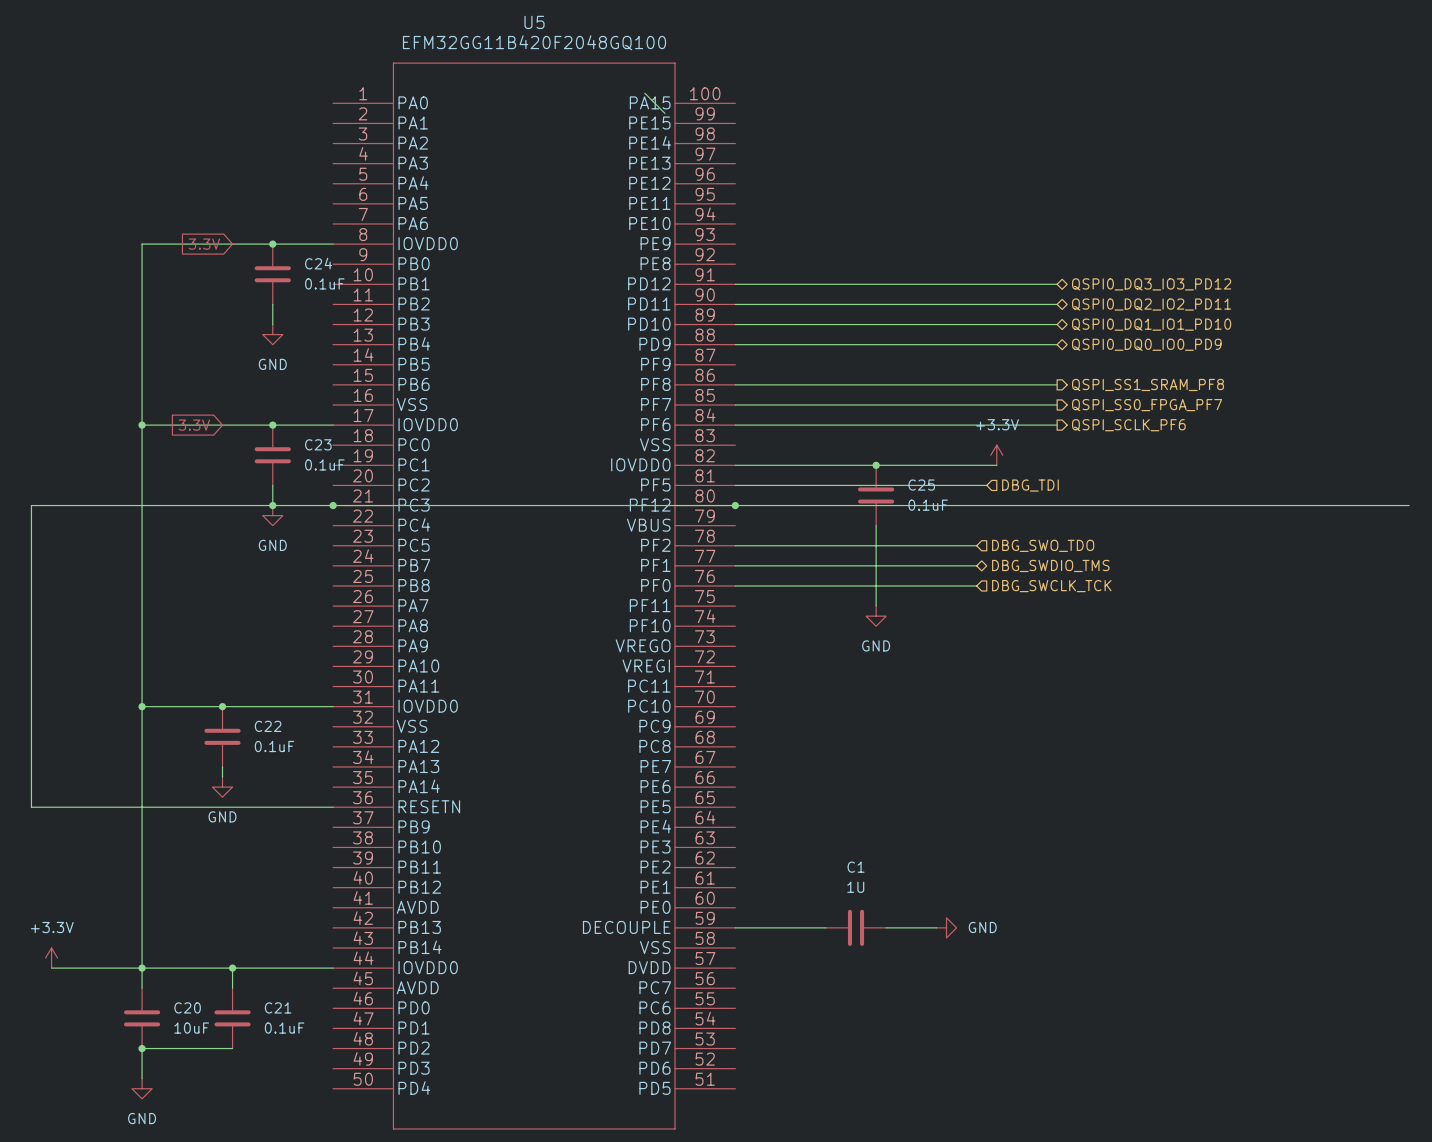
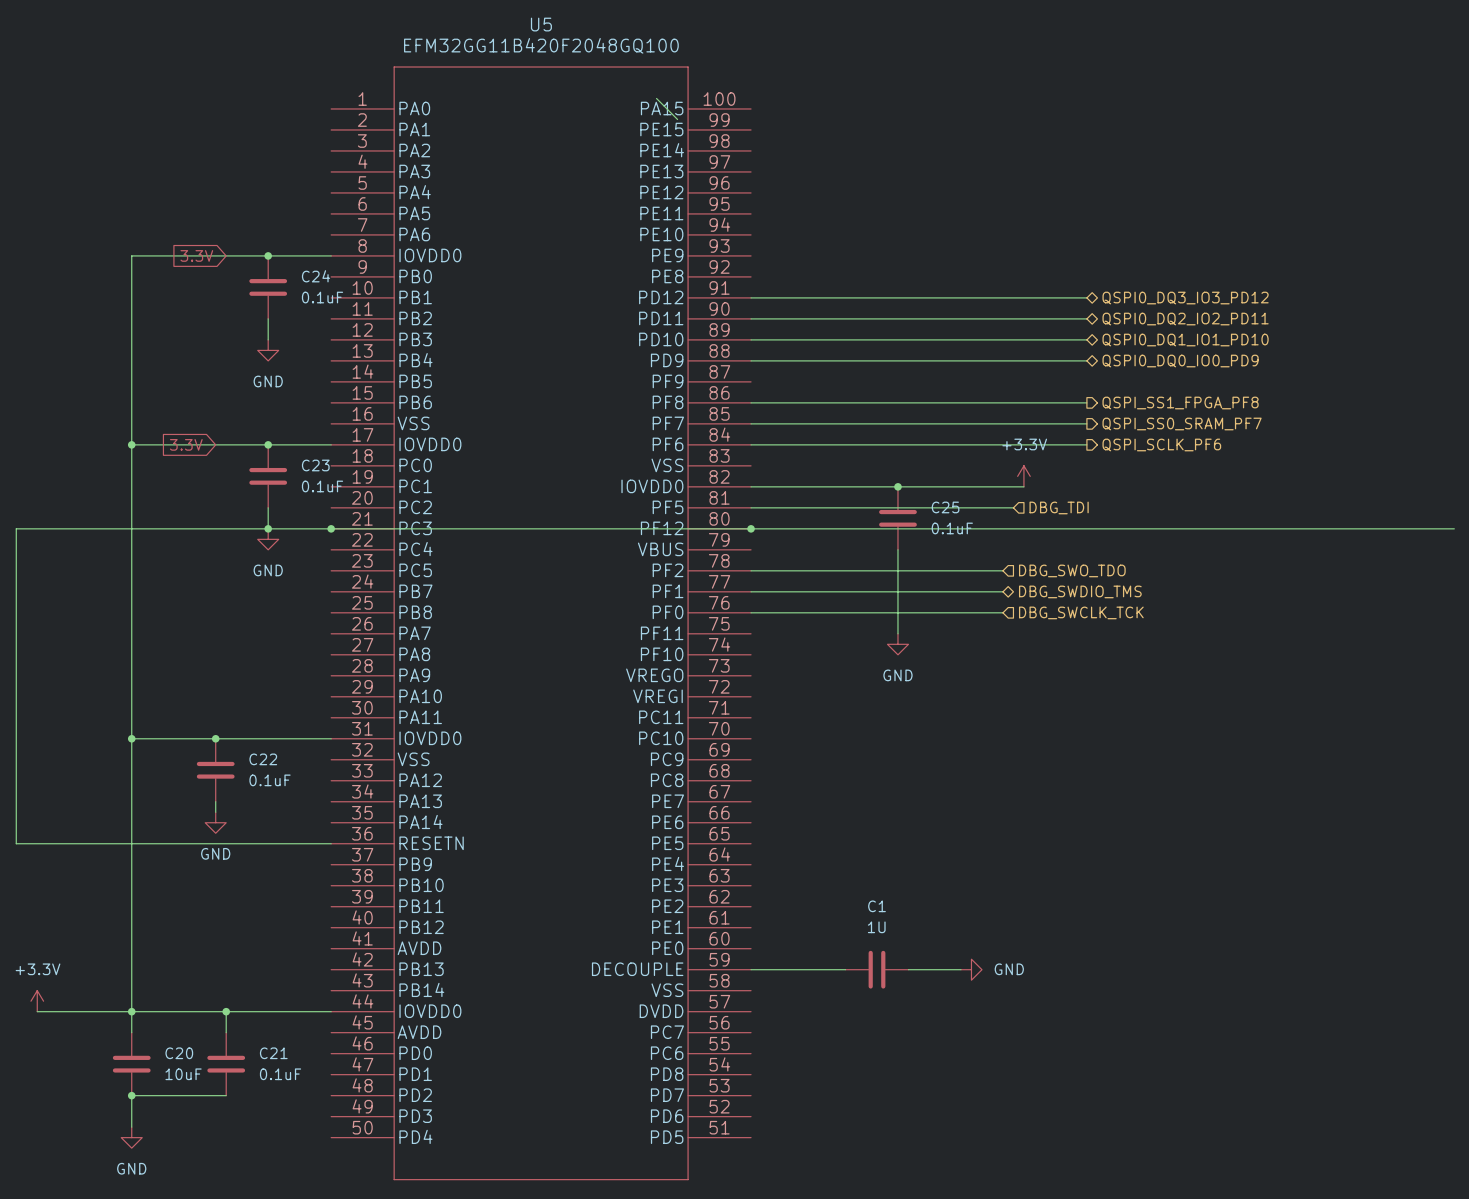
hierarchical label: QSPI_SS1_SRAM_PF8 (1148, 384) -> QSPI_SS1_FPGA_PF8 (1180, 403)
hierarchical label: QSPI_SS0_FPGA_PF7 (1147, 405) -> QSPI_SS0_SRAM_PF7 (1182, 423)

